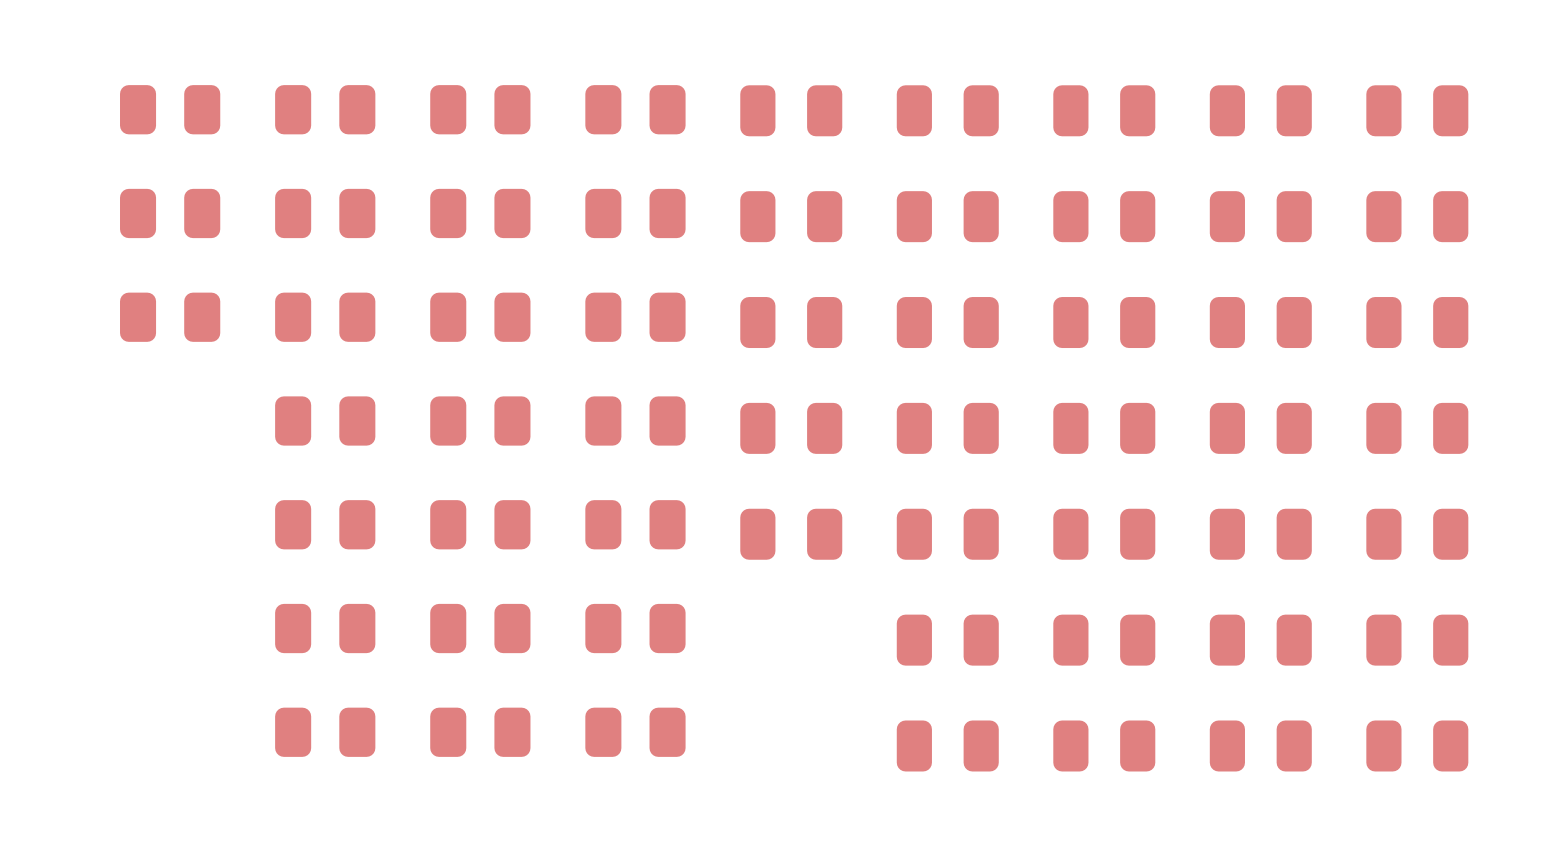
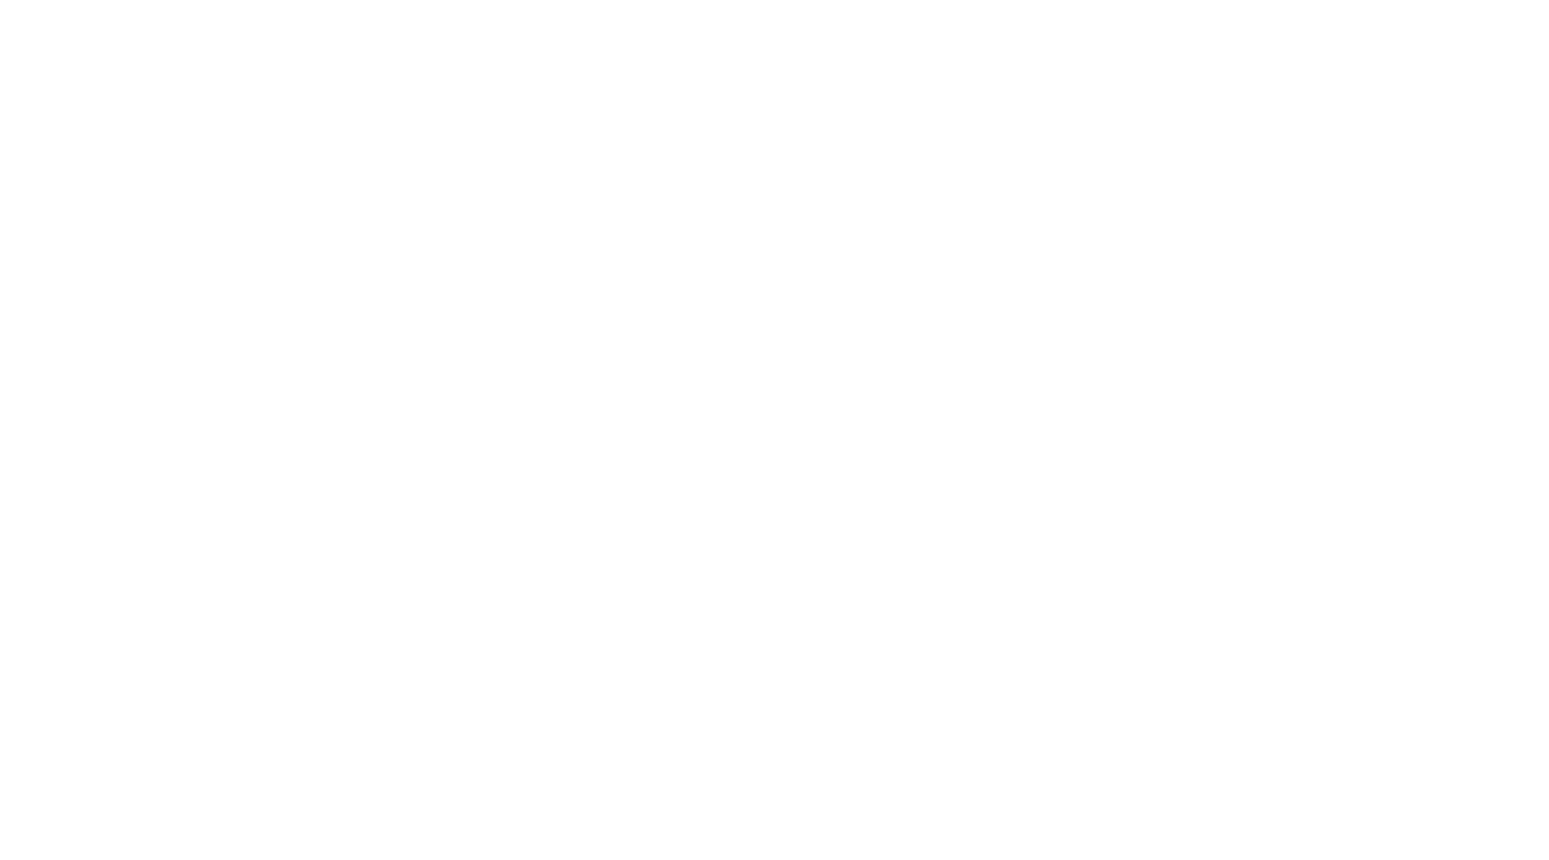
part: (170, 109) -> none
part: (325, 109) -> none
part: (480, 109) -> none
part: (635, 109) -> none
part: (791, 110) -> none
part: (947, 110) -> none
part: (1104, 110) -> none
part: (1260, 110) -> none
part: (1417, 110) -> none
part: (170, 213) -> none
part: (325, 213) -> none
part: (480, 213) -> none
part: (635, 213) -> none
part: (791, 216) -> none
part: (947, 216) -> none
part: (1104, 216) -> none
part: (1260, 216) -> none
part: (1417, 216) -> none
part: (170, 317) -> none
part: (325, 317) -> none
part: (480, 317) -> none
part: (635, 317) -> none
part: (791, 322) -> none
part: (947, 322) -> none
part: (1104, 322) -> none
part: (1260, 322) -> none
part: (1417, 322) -> none
part: (325, 421) -> none
part: (480, 421) -> none
part: (635, 421) -> none
part: (791, 428) -> none
part: (947, 428) -> none
part: (1104, 428) -> none
part: (1260, 428) -> none
part: (1417, 428) -> none
part: (325, 524) -> none
part: (480, 524) -> none
part: (635, 524) -> none
part: (791, 534) -> none
part: (947, 534) -> none
part: (1104, 534) -> none
part: (1260, 534) -> none
part: (1417, 534) -> none
part: (325, 628) -> none
part: (480, 628) -> none
part: (635, 628) -> none
part: (947, 640) -> none
part: (1104, 640) -> none
part: (1260, 640) -> none
part: (1417, 640) -> none
part: (325, 732) -> none
part: (480, 732) -> none
part: (635, 732) -> none
part: (947, 745) -> none
part: (1104, 745) -> none
part: (1260, 745) -> none
part: (1417, 745) -> none

